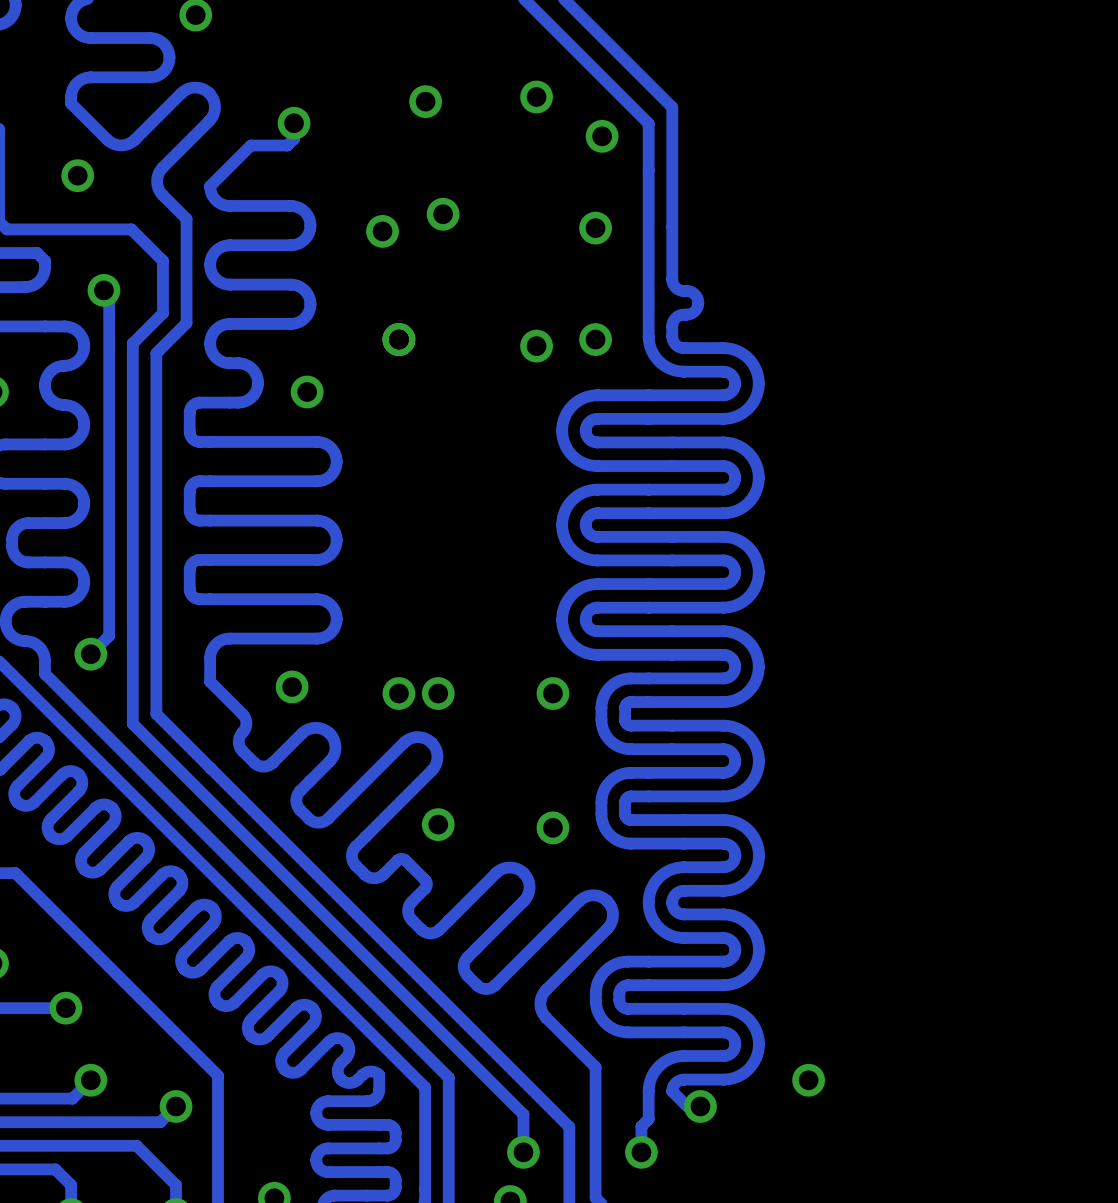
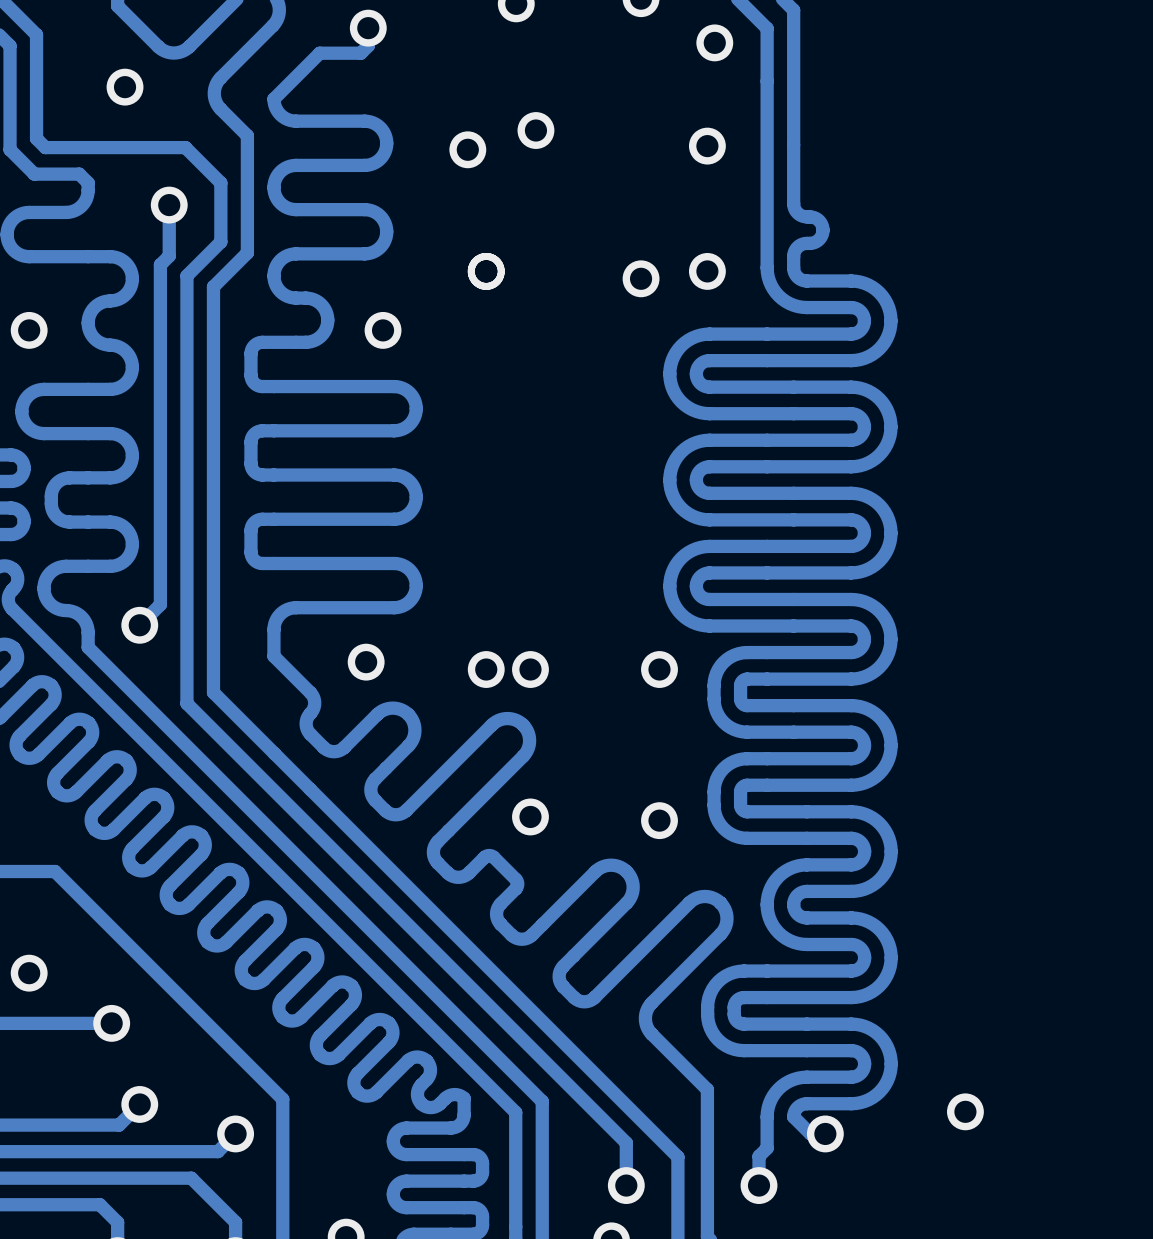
track: (103, 290) (109, 295) (109, 333) -> (169, 205) (169, 256) (160, 264)
via position: (103, 290) -> (169, 205)
via position: (808, 1080) -> (965, 1111)

